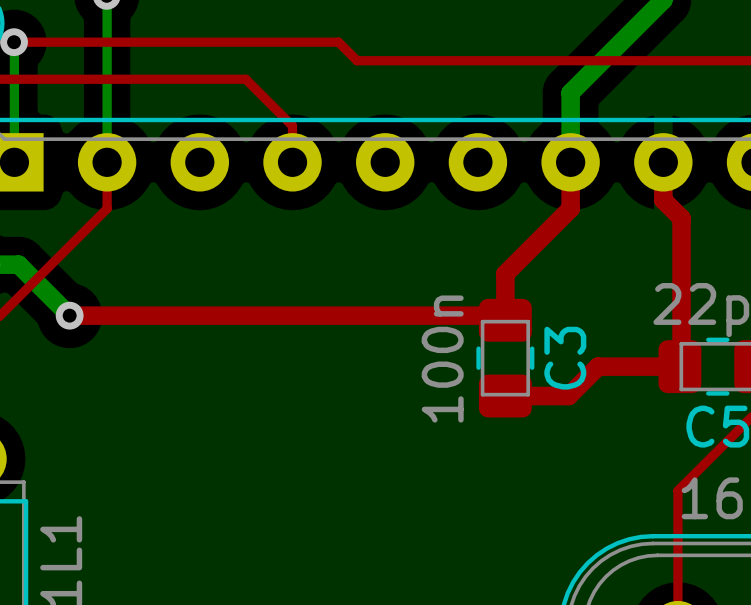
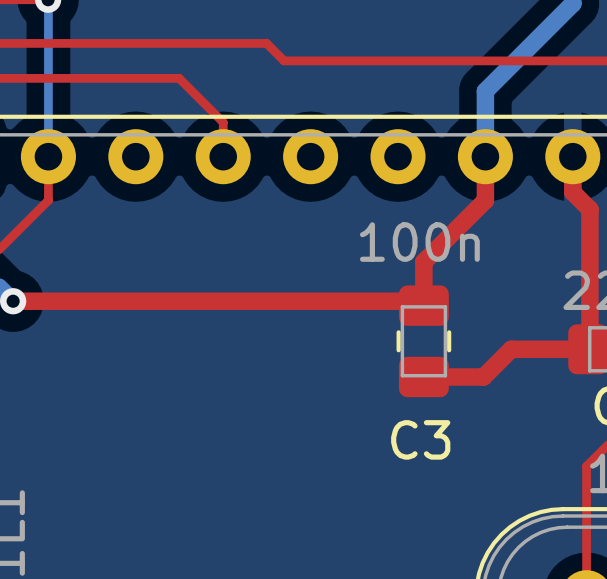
C3 name rotation: 0° (565, 358) -> 90° clockwise (420, 439)
C3 name position: C3 (565, 358) -> C3 (420, 439)
C3 value rotation: 0° (442, 359) -> 90° clockwise (419, 242)

